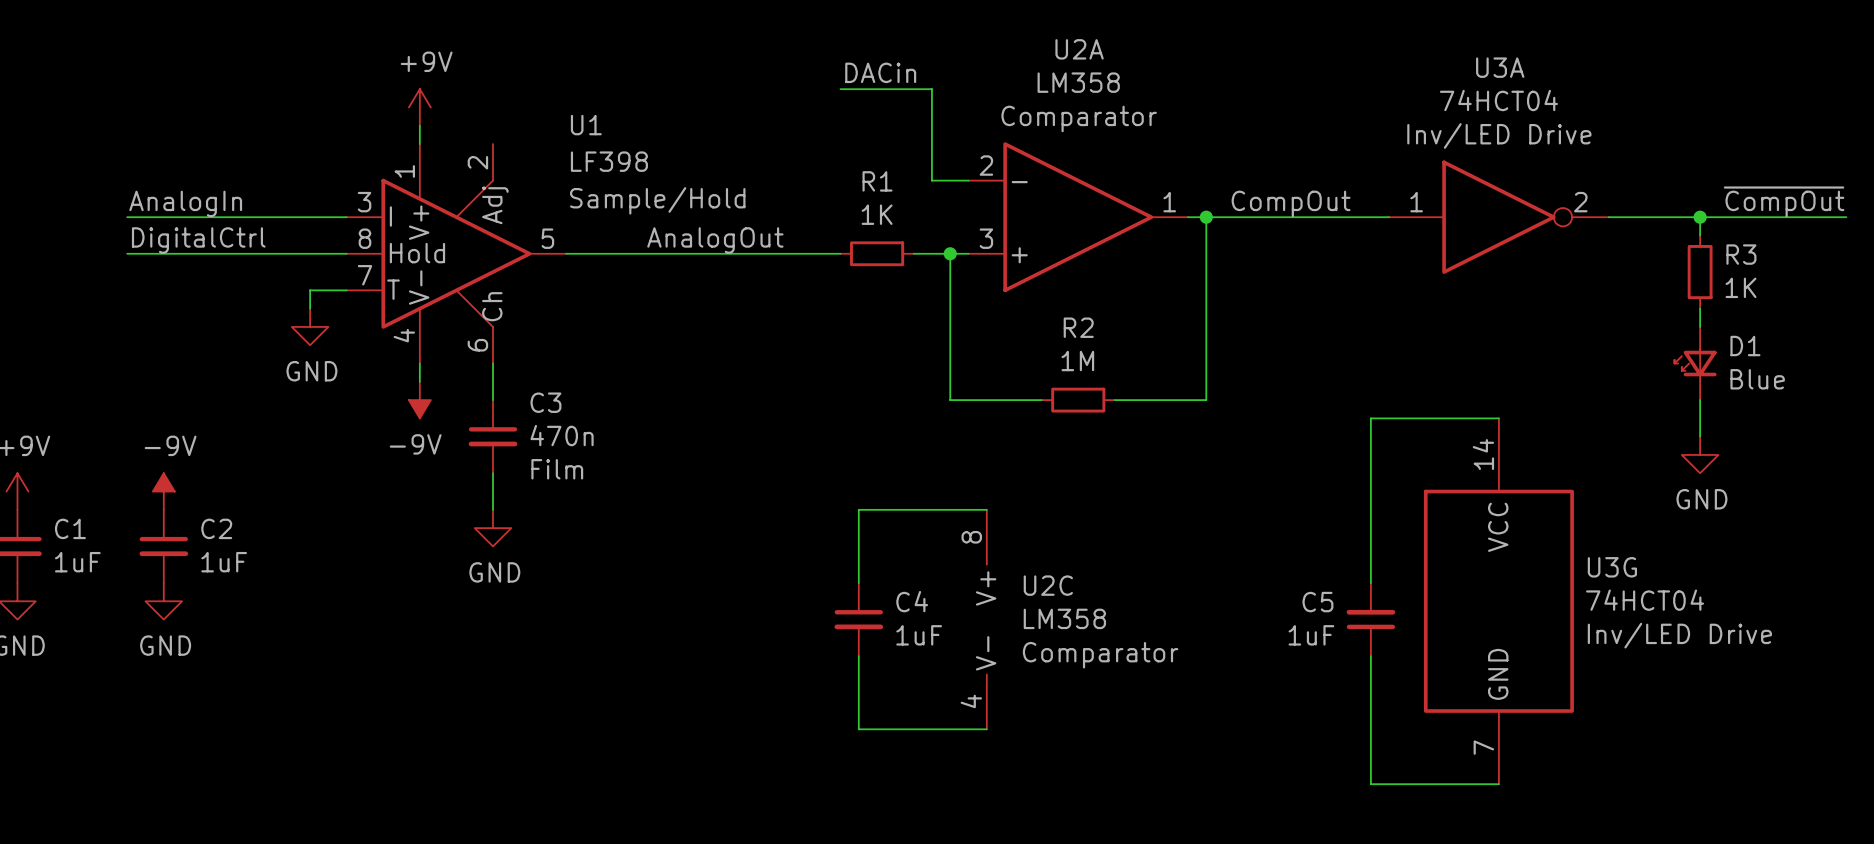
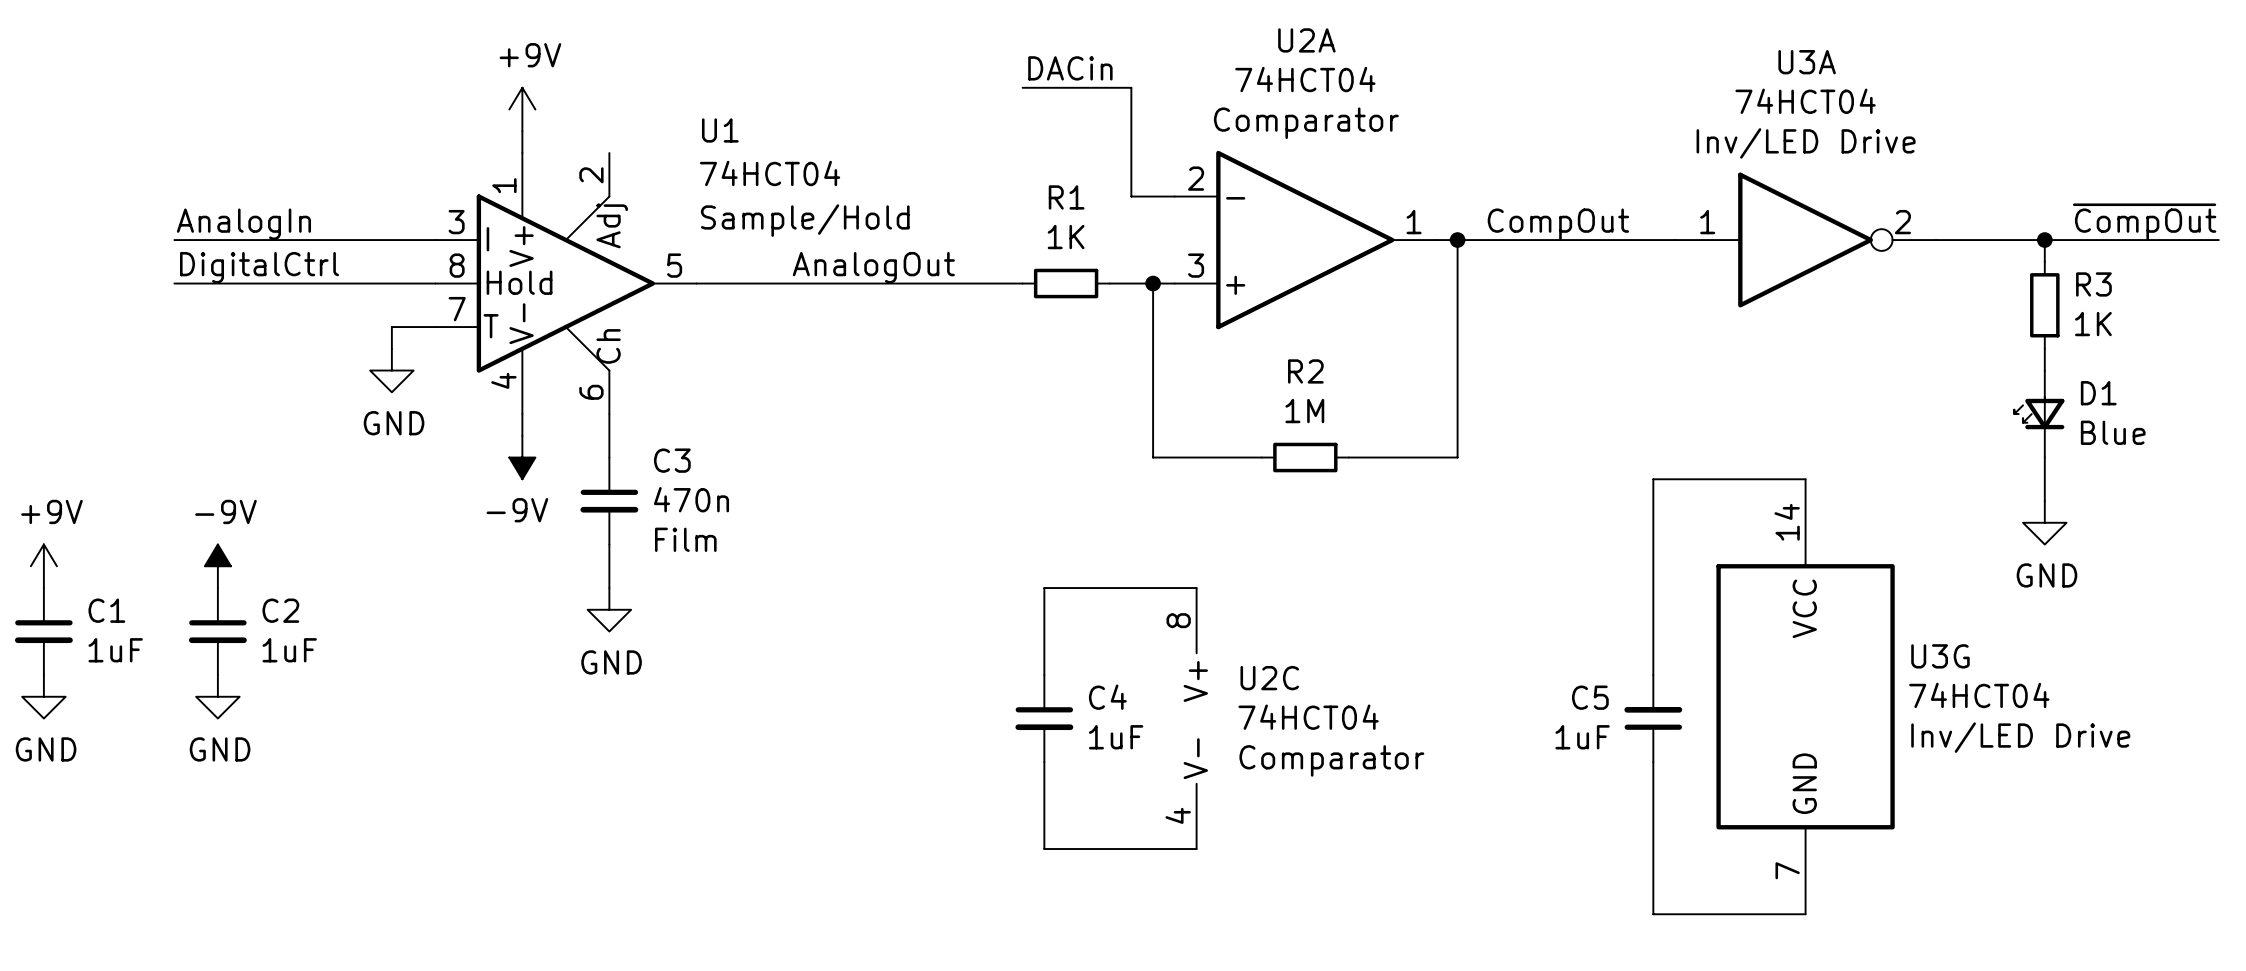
U2A value: LM358 (1078, 82) -> 74HCT04 (1305, 79)
U1 value: LF398 (609, 161) -> 74HCT04 (770, 173)
U2C value: LM358 (1064, 618) -> 74HCT04 (1308, 717)

